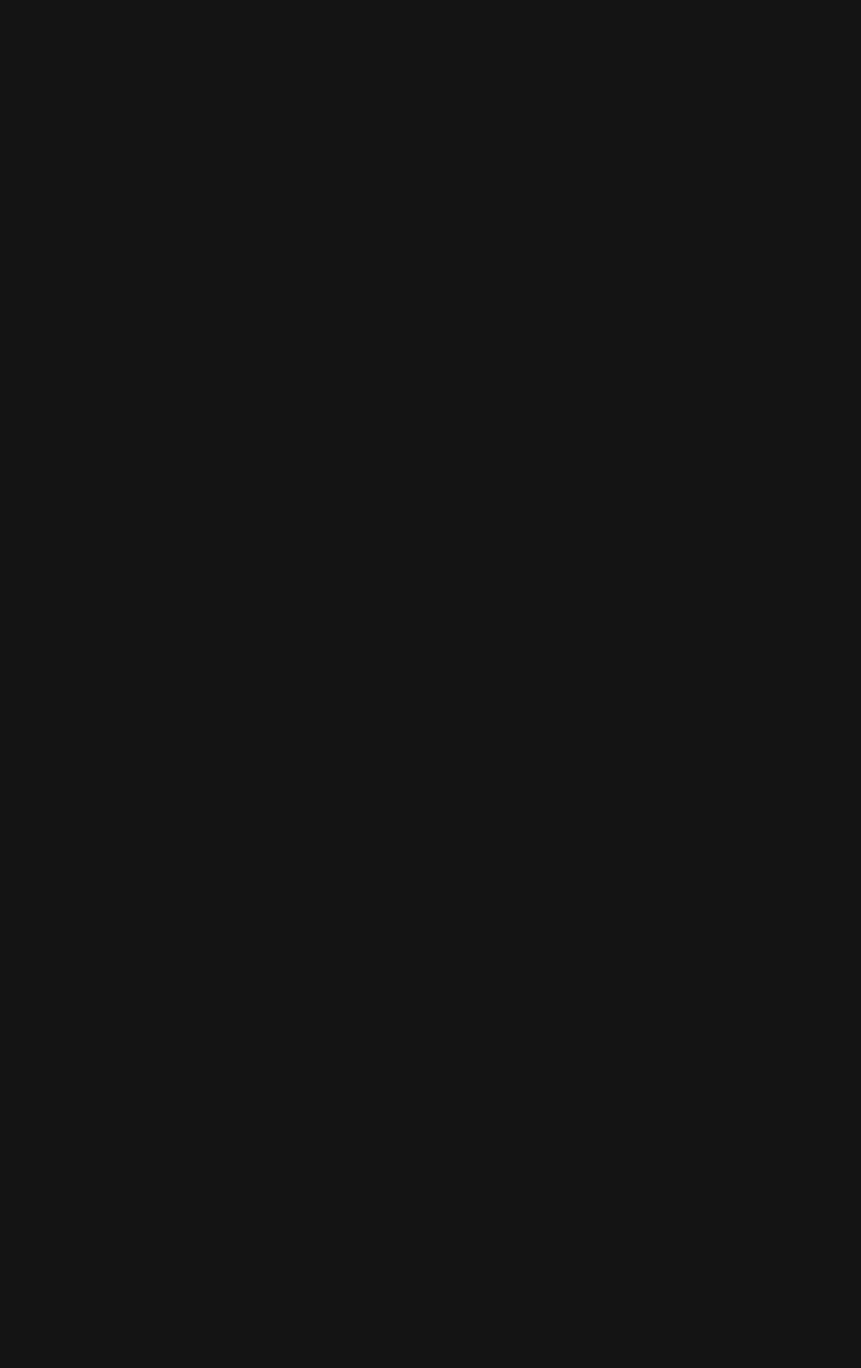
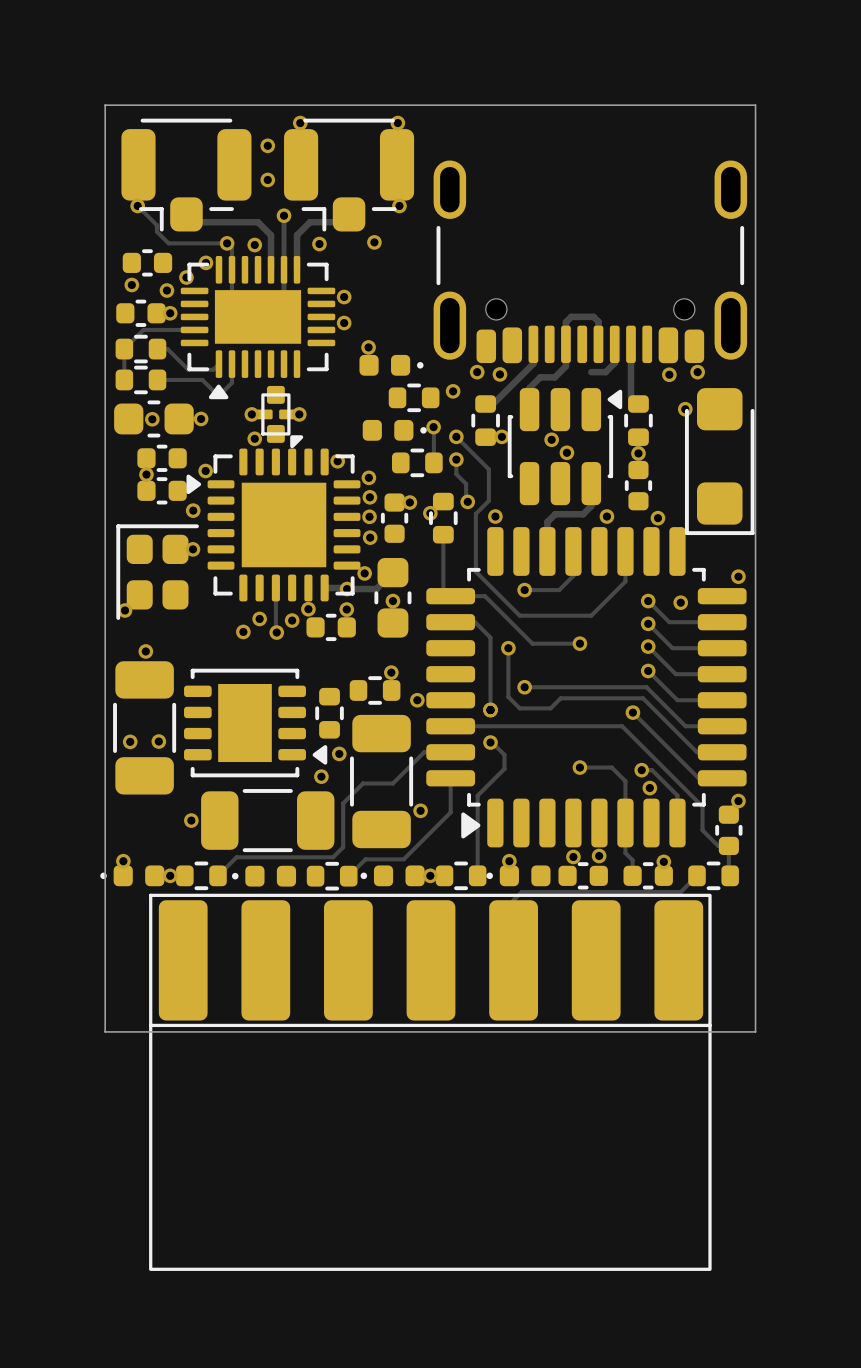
board edge: none -> (105, 105) (755, 105) (755, 1031) (105, 1031) (105, 105)
via: none -> (300, 123)
via: none -> (397, 123)
via: none -> (267, 145)
part: none -> (186, 175)
part: none -> (349, 175)
via: none -> (267, 179)
track: none -> (137, 205) (156, 225) (156, 231) (168, 243) (227, 243) (231, 248) (231, 290) (258, 316) (284, 290) (284, 215)
via: none -> (137, 205)
via: none -> (399, 205)
track: none -> (186, 214) (194, 222) (258, 222) (271, 235) (271, 269)
track: none -> (349, 214) (342, 222) (310, 222) (297, 235) (297, 269)
via: none -> (284, 215)
via: none -> (374, 242)
via: none -> (227, 243)
via: none -> (319, 244)
via: none -> (254, 245)
part: none -> (590, 261)
part: none -> (147, 262)
via: none -> (205, 262)
via: none -> (186, 277)
via: none -> (131, 284)
via: none -> (166, 290)
via: none -> (344, 297)
part: none -> (140, 313)
via: none -> (170, 313)
via: none -> (344, 323)
part: none -> (258, 327)
track: none -> (194, 329) (143, 329) (124, 349) (124, 379)
track: none -> (533, 344) (533, 363) (493, 404) (485, 404)
track: none -> (598, 344) (598, 321) (593, 316) (571, 316) (565, 322) (565, 366) (554, 377) (540, 377) (529, 388) (529, 409)
track: none -> (614, 344) (614, 363) (605, 372) (591, 372)
track: none -> (630, 344) (630, 396) (638, 404)
via: none -> (368, 347)
part: none -> (140, 349)
track: none -> (157, 349) (167, 349) (188, 369) (213, 369) (218, 364)
track: none -> (231, 364) (231, 382) (223, 391) (213, 391) (202, 379) (157, 379)
part: none -> (391, 365)
via: none -> (477, 372)
via: none -> (697, 372)
via: none -> (499, 374)
via: none -> (669, 374)
part: none -> (140, 379)
via: none -> (453, 391)
part: none -> (414, 397)
via: none -> (685, 409)
via: none -> (251, 414)
via: none -> (299, 414)
part: none -> (279, 417)
part: none -> (153, 418)
via: none -> (201, 418)
via: none -> (152, 419)
part: none -> (485, 420)
part: none -> (638, 420)
track: none -> (433, 427) (433, 462)
via: none -> (433, 427)
part: none -> (394, 430)
track: none -> (456, 436) (488, 469) (488, 500) (475, 513) (475, 571) (519, 615) (591, 615) (625, 581) (625, 551)
via: none -> (456, 436)
via: none -> (501, 436)
via: none -> (254, 438)
via: none -> (551, 439)
part: none -> (564, 446)
via: none -> (566, 452)
via: none -> (638, 453)
part: none -> (162, 458)
track: none -> (456, 459) (456, 474) (466, 484) (467, 501)
via: none -> (456, 459)
via: none -> (337, 461)
part: none -> (719, 461)
part: none -> (417, 462)
via: none -> (205, 471)
via: none -> (146, 474)
via: none -> (368, 477)
track: none -> (591, 483) (591, 506) (583, 514) (555, 514) (547, 522) (547, 551)
part: none -> (638, 485)
part: none -> (162, 490)
via: none -> (369, 497)
via: none -> (467, 501)
via: none -> (409, 502)
via: none -> (193, 510)
via: none -> (430, 513)
via: none -> (369, 516)
via: none -> (495, 516)
via: none -> (606, 516)
part: none -> (394, 518)
part: none -> (443, 518)
via: none -> (657, 518)
part: none -> (273, 524)
track: none -> (443, 534) (443, 588) (450, 596) (485, 596) (532, 643) (579, 643)
via: none -> (370, 537)
via: none -> (192, 549)
track: none -> (573, 551) (573, 575) (559, 590) (524, 590)
part: none -> (157, 572)
track: none -> (392, 572) (376, 589) (324, 587)
via: none -> (364, 573)
via: none -> (738, 576)
track: none -> (275, 587) (276, 632)
via: none -> (347, 589)
via: none -> (524, 590)
part: none -> (392, 597)
via: none -> (392, 601)
track: none -> (648, 601) (669, 622) (722, 622)
via: none -> (648, 601)
via: none -> (680, 602)
via: none -> (308, 609)
via: none -> (346, 609)
via: none -> (125, 610)
via: none -> (259, 618)
via: none -> (292, 620)
track: none -> (450, 622) (475, 622) (490, 637) (490, 710)
track: none -> (648, 623) (672, 648) (722, 648)
via: none -> (648, 623)
part: none -> (331, 627)
via: none -> (243, 631)
via: none -> (276, 632)
via: none -> (579, 643)
track: none -> (648, 646) (675, 674) (722, 674)
via: none -> (648, 646)
track: none -> (508, 648) (508, 696) (519, 708) (550, 708) (560, 698) (643, 698) (696, 752) (722, 752)
via: none -> (508, 648)
via: none -> (145, 651)
track: none -> (648, 670) (677, 700) (722, 700)
via: none -> (648, 670)
via: none -> (391, 672)
track: none -> (524, 687) (646, 687) (685, 726) (722, 726)
via: none -> (524, 687)
part: none -> (586, 687)
part: none -> (375, 690)
via: none -> (417, 700)
via: none -> (490, 710)
track: none -> (632, 712) (698, 778) (722, 778)
via: none -> (632, 712)
part: none -> (329, 713)
part: none -> (255, 723)
track: none -> (450, 726) (622, 726) (702, 806) (702, 830) (718, 845) (728, 845) (730, 875)
part: none -> (144, 727)
via: none -> (130, 741)
via: none -> (158, 741)
track: none -> (490, 742) (504, 754) (504, 768) (477, 795) (477, 875)
via: none -> (490, 742)
track: none -> (450, 752) (424, 752) (392, 783) (363, 783) (343, 803) (343, 847) (333, 857) (236, 857) (218, 875)
via: none -> (339, 753)
track: none -> (579, 767) (611, 767) (625, 781) (625, 853) (632, 860) (632, 875)
via: none -> (579, 767)
track: none -> (641, 770) (652, 770) (677, 795) (677, 823)
via: none -> (641, 770)
via: none -> (321, 776)
track: none -> (450, 778) (450, 812) (403, 859) (365, 859) (348, 876)
part: none -> (381, 781)
via: none -> (649, 788)
via: none -> (738, 801)
via: none -> (420, 810)
via: none -> (191, 820)
part: none -> (267, 820)
part: none -> (728, 830)
via: none -> (573, 856)
via: none -> (599, 856)
via: none -> (123, 861)
via: none -> (509, 861)
via: none -> (663, 861)
part: none -> (132, 875)
via: none -> (170, 875)
part: none -> (201, 875)
part: none -> (392, 875)
via: none -> (430, 875)
part: none -> (461, 875)
part: none -> (518, 875)
part: none -> (583, 875)
part: none -> (648, 875)
track: none -> (696, 875) (680, 892) (521, 892) (513, 900) (513, 960)
part: none -> (713, 875)
part: none -> (264, 876)
part: none -> (332, 876)
part: none -> (430, 1082)

